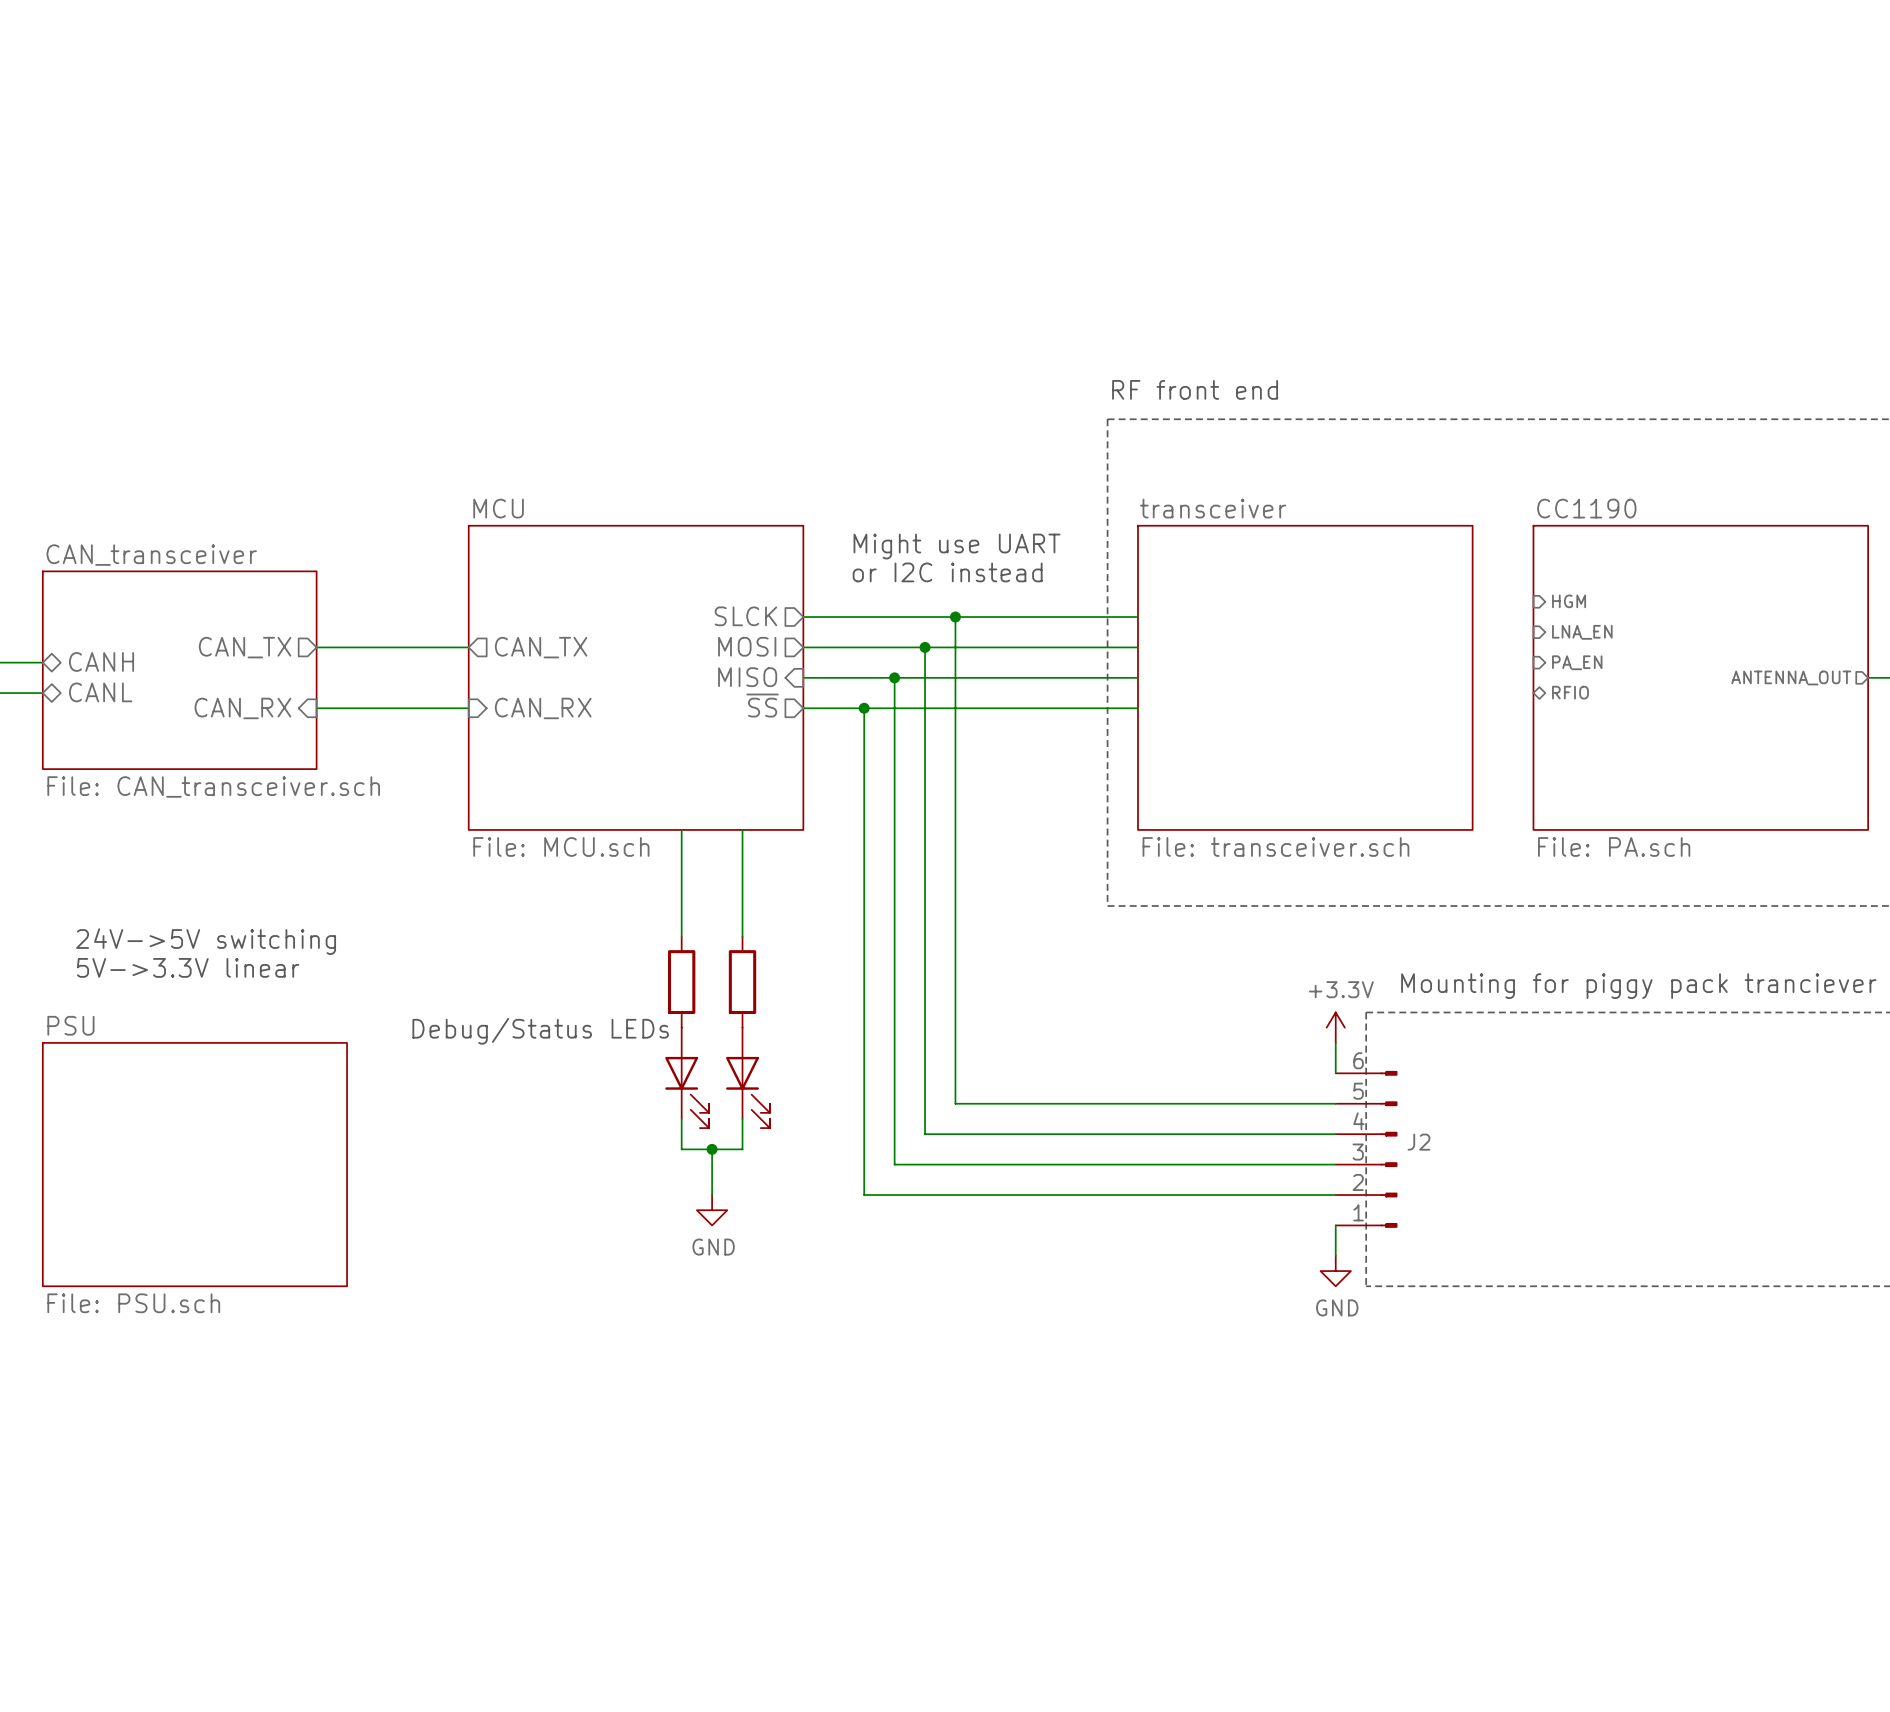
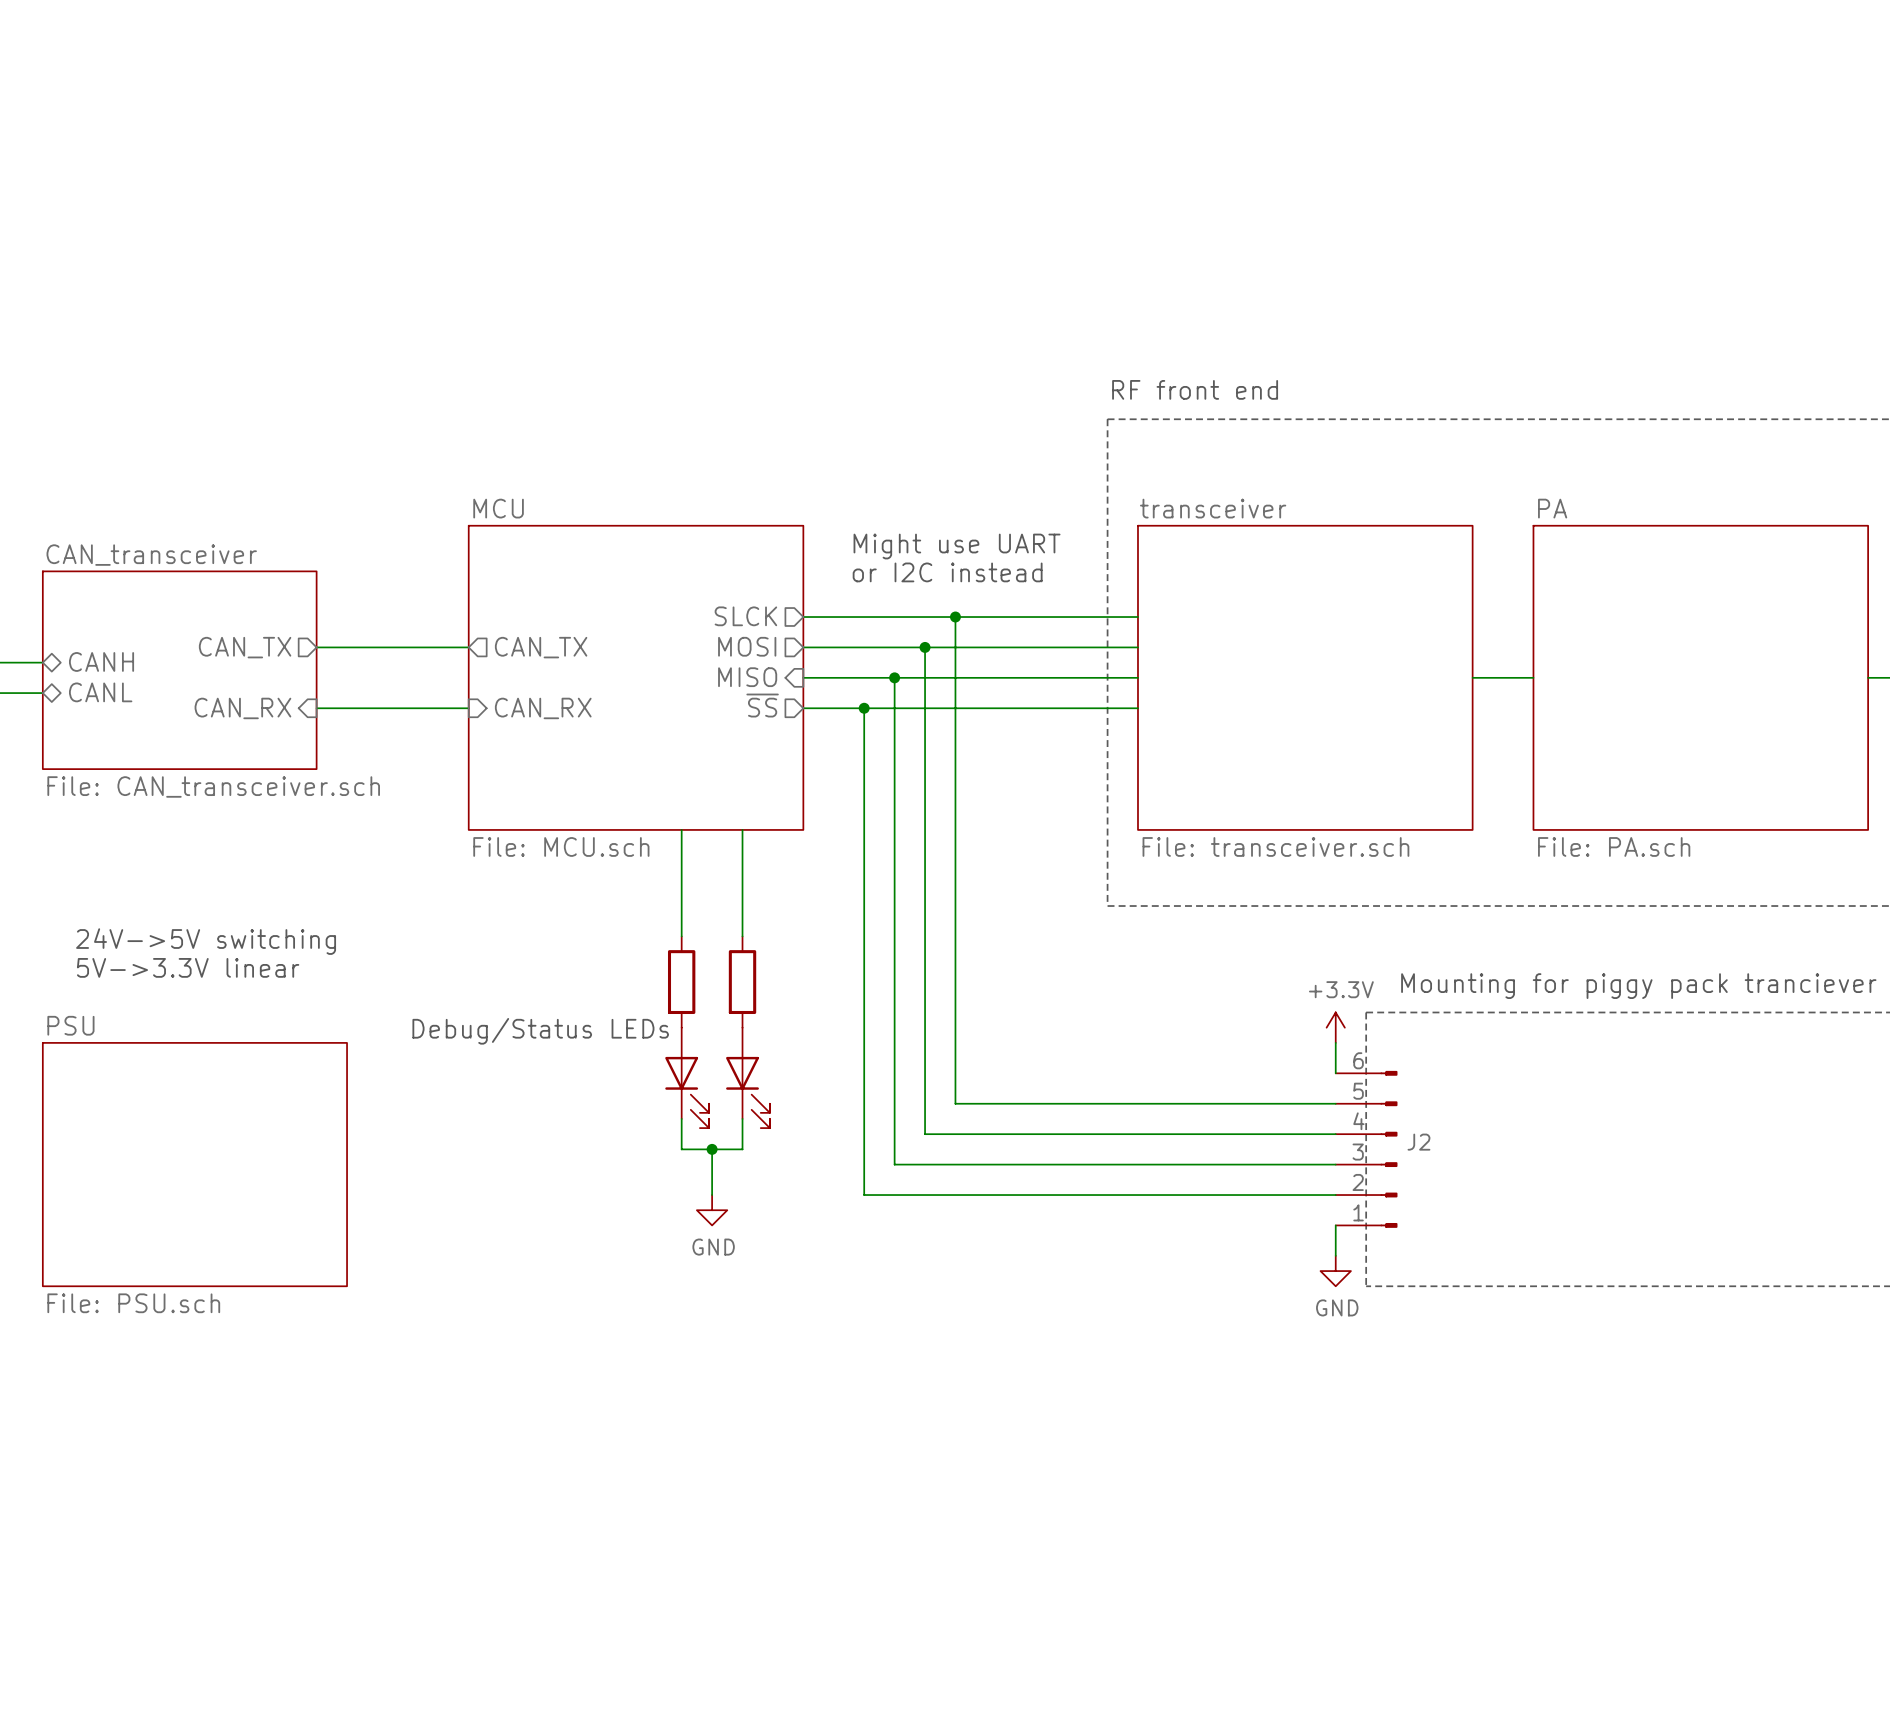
sheet CC1190 name: CC1190 (1586, 508) -> PA (1552, 508)
sheet pin: HGM (1569, 601) -> none
sheet pin: LNA_EN (1582, 632) -> none
sheet pin: PA_EN (1577, 662) -> none
wire: none -> (1472, 677) (1533, 677)
sheet pin: ANTENNA_OUT (1791, 677) -> none
sheet pin: RFIO (1570, 692) -> none

